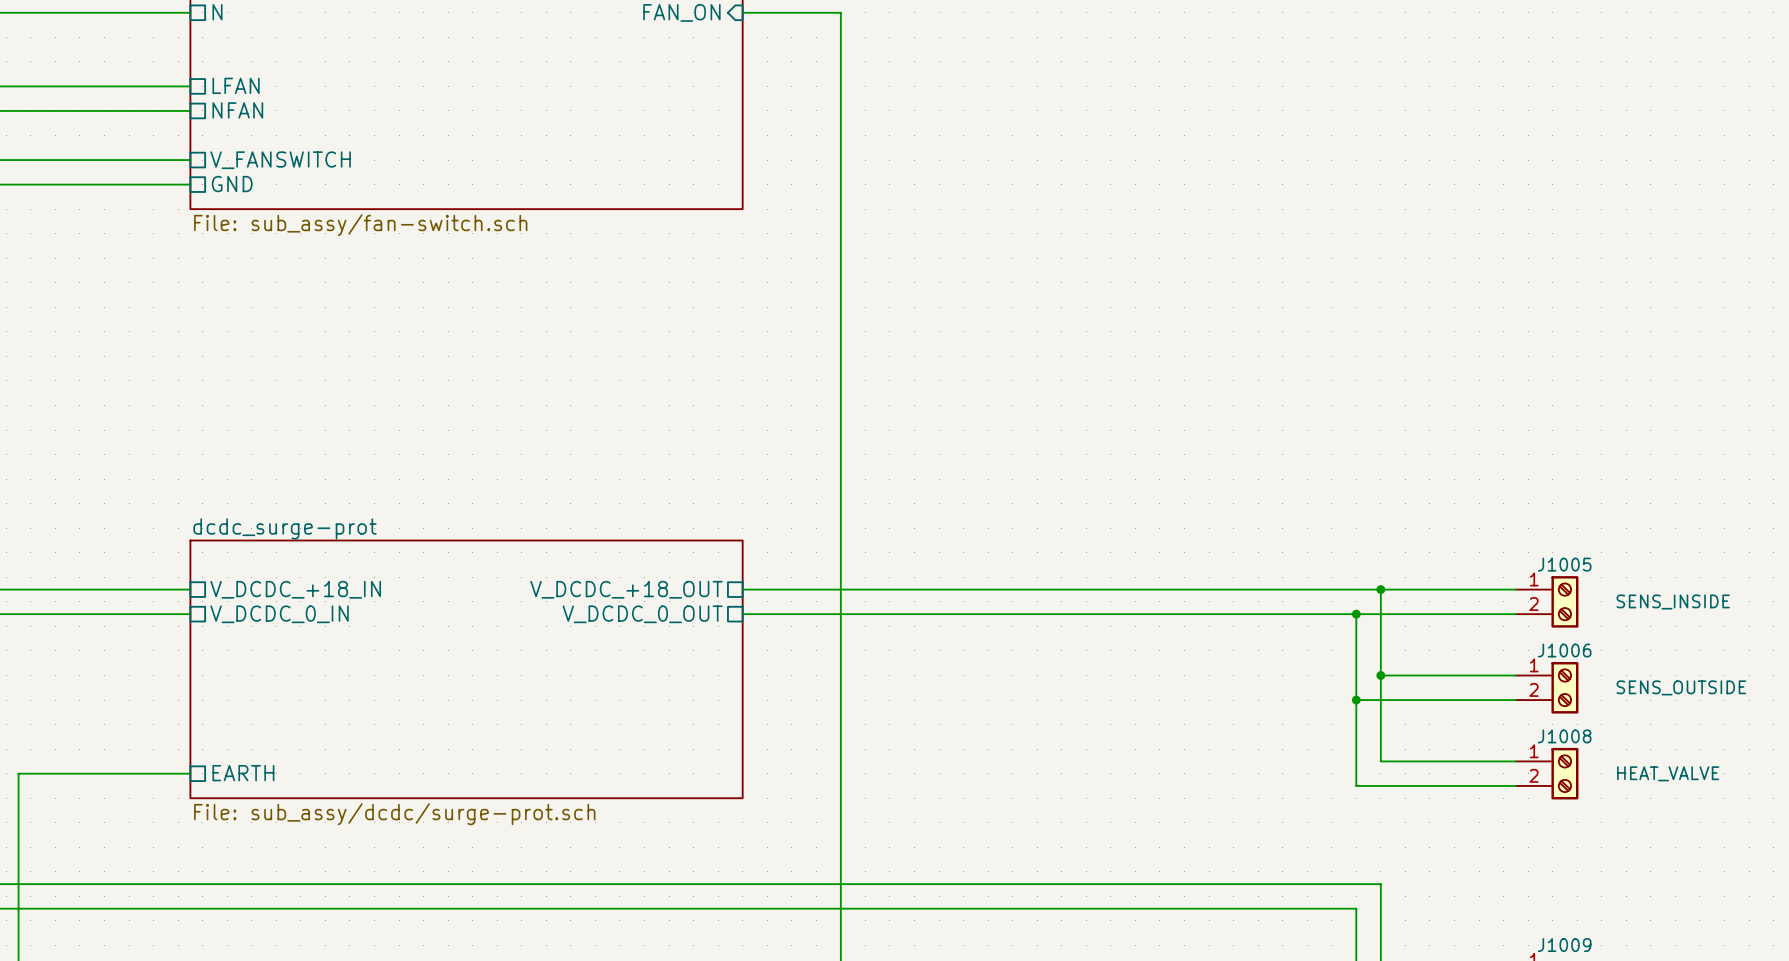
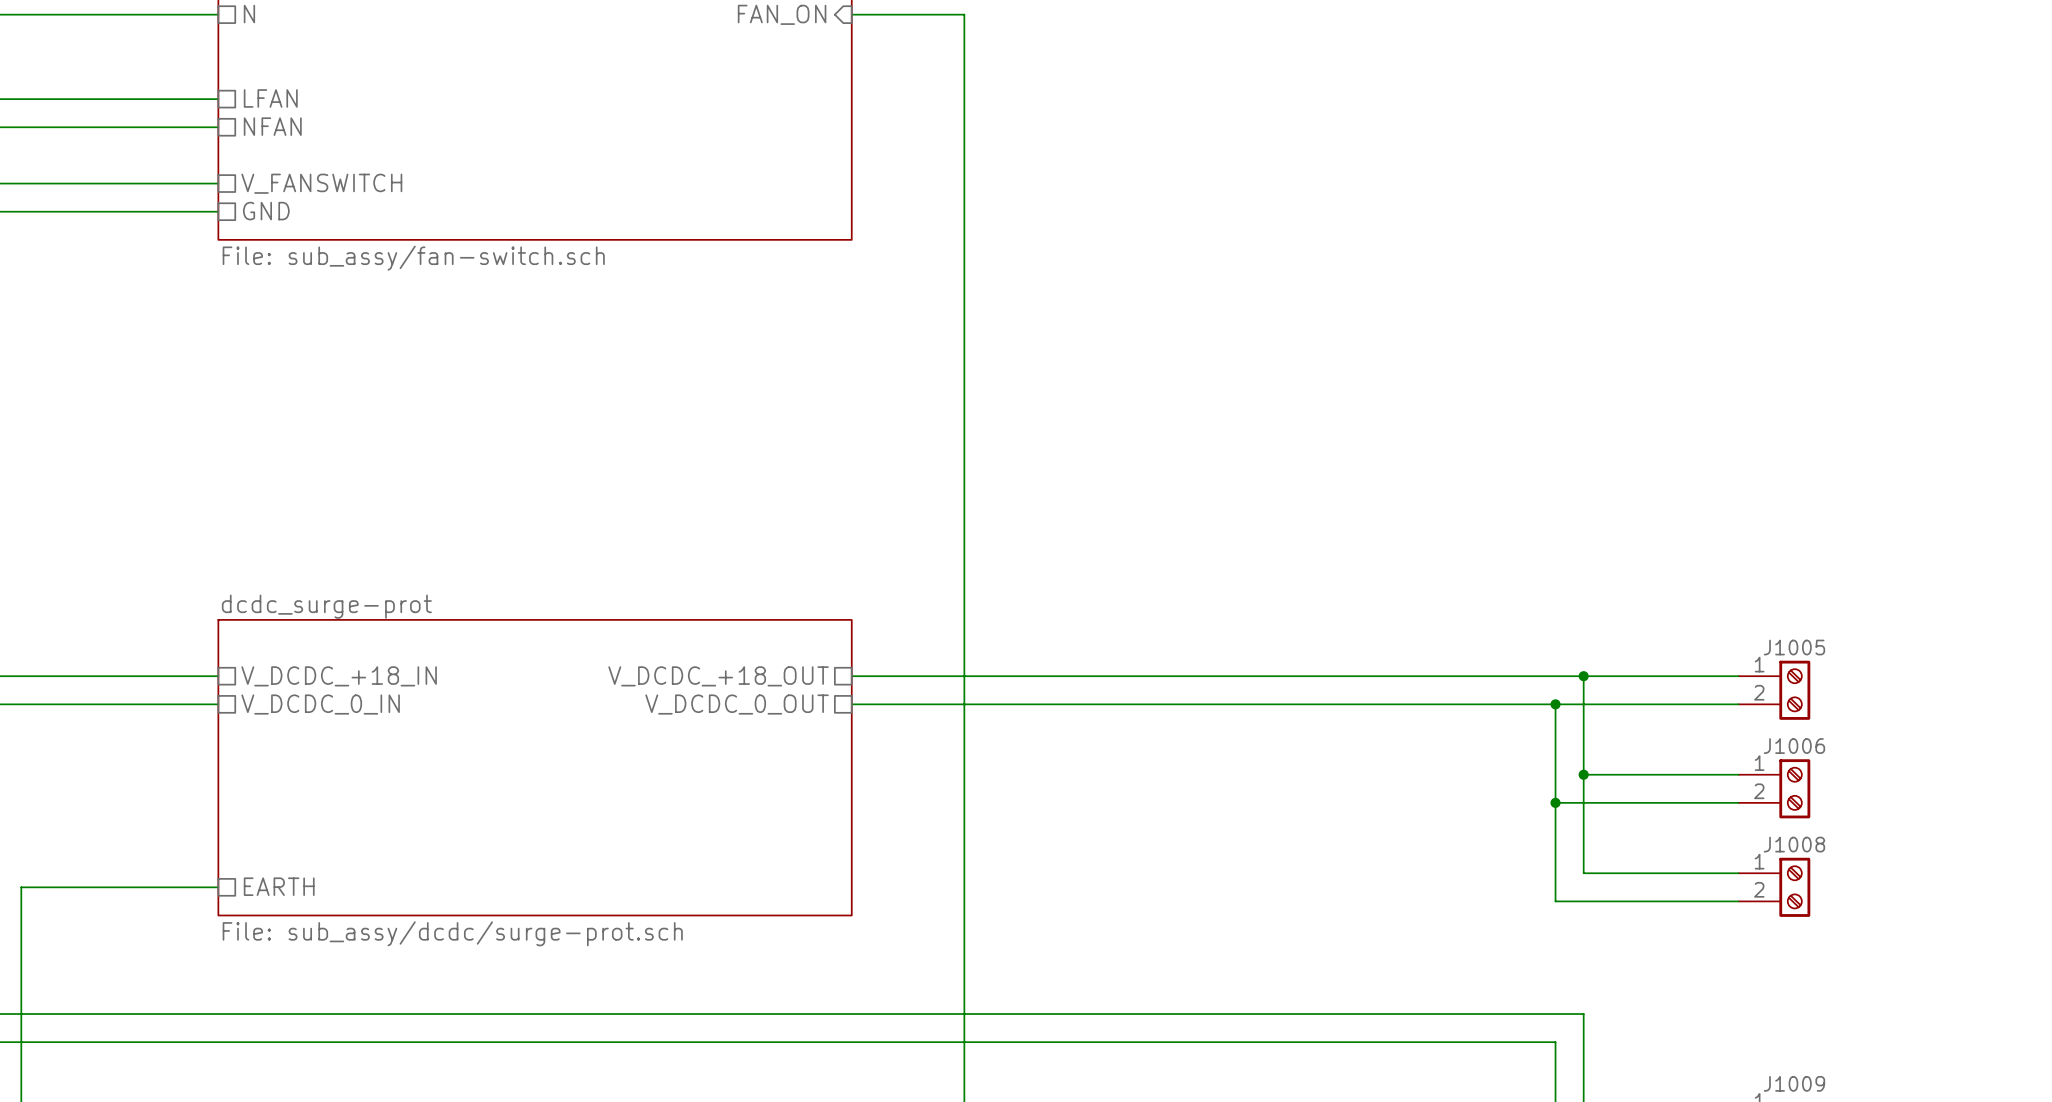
J1005 value: SENS_INSIDE (1673, 602) -> none
J1006 value: SENS_OUTSIDE (1681, 687) -> none
J1008 value: HEAT_VALVE (1668, 773) -> none

